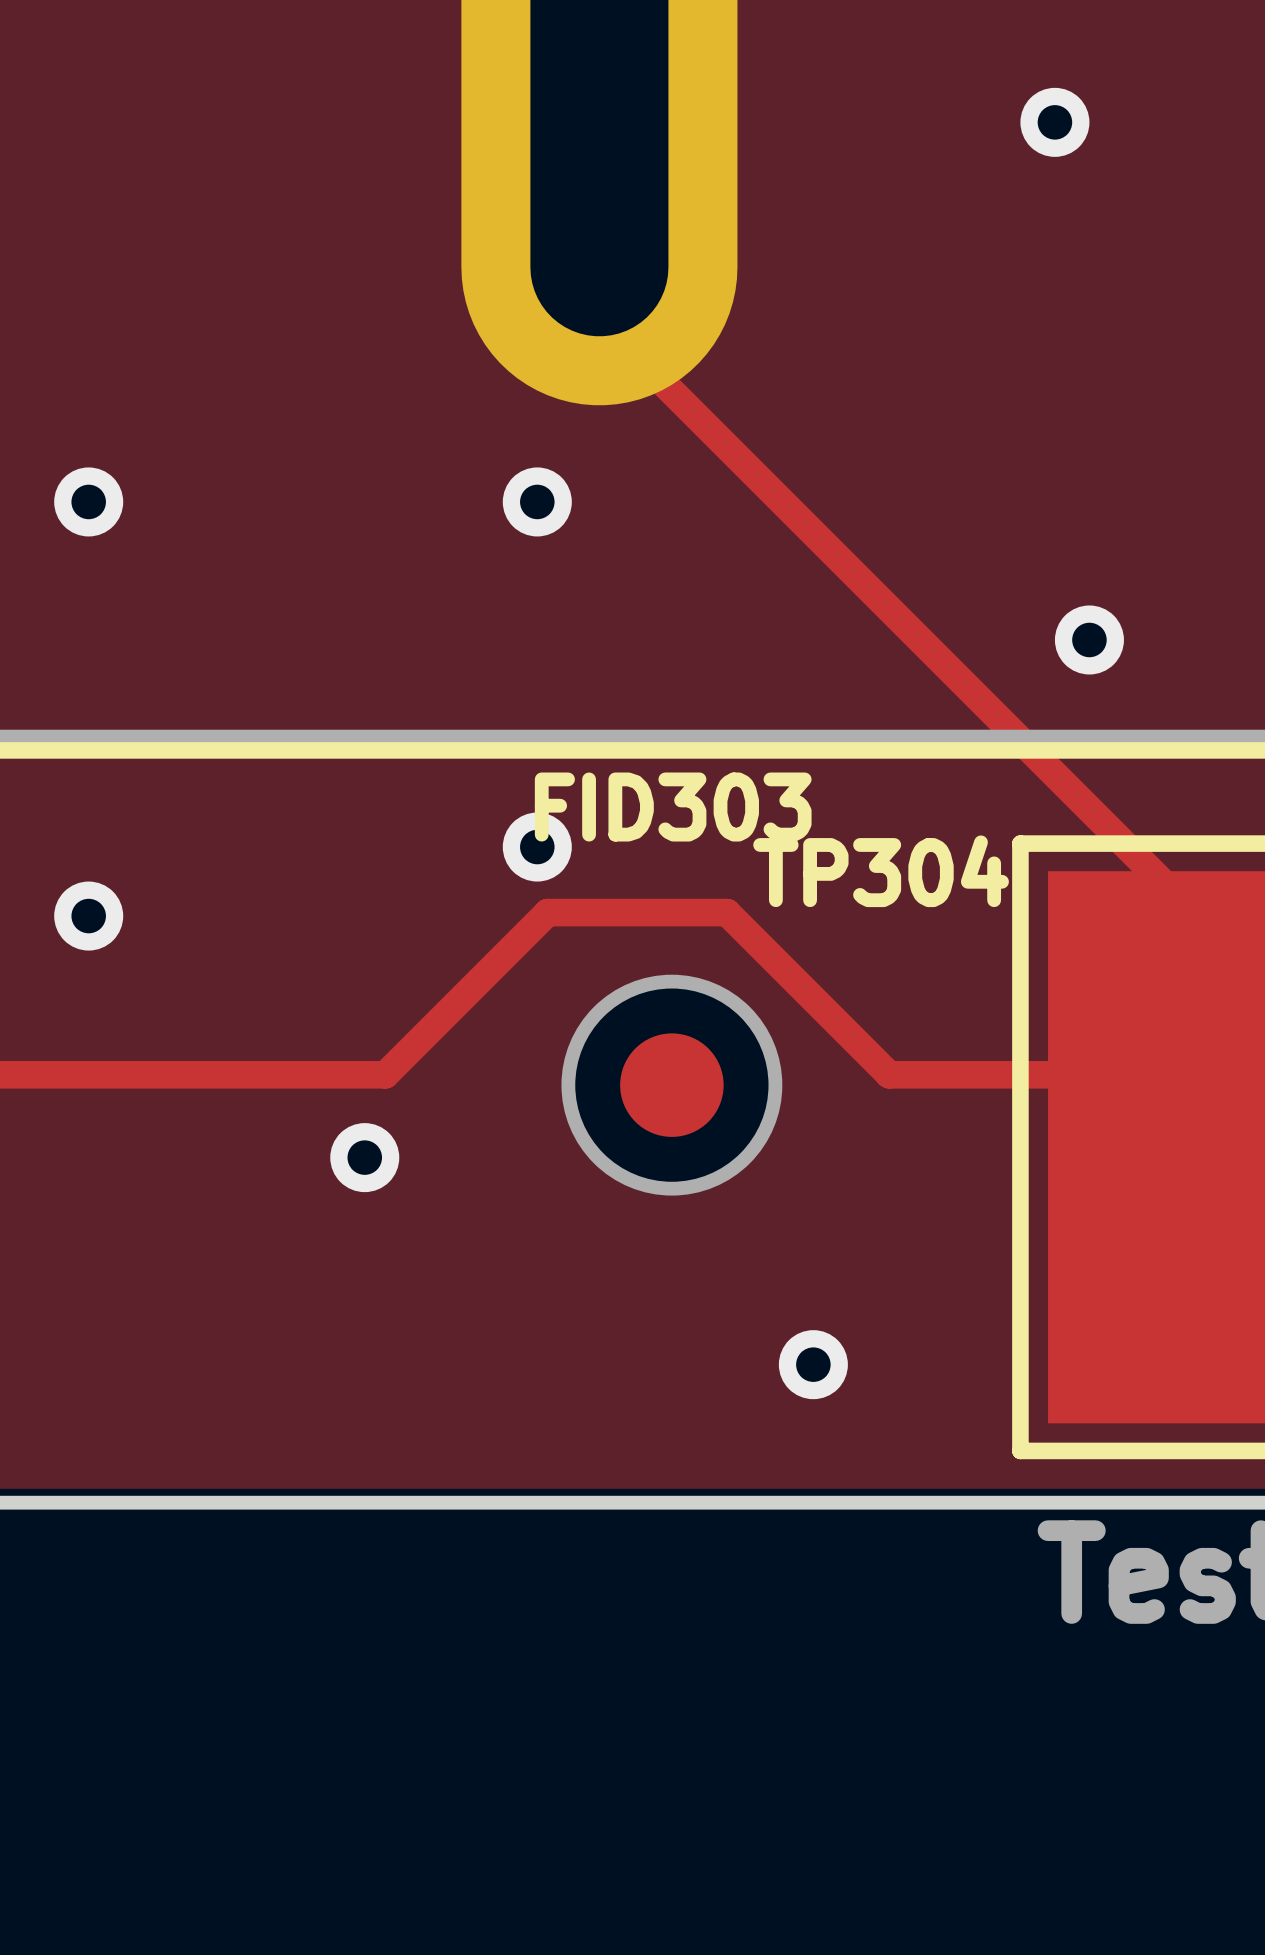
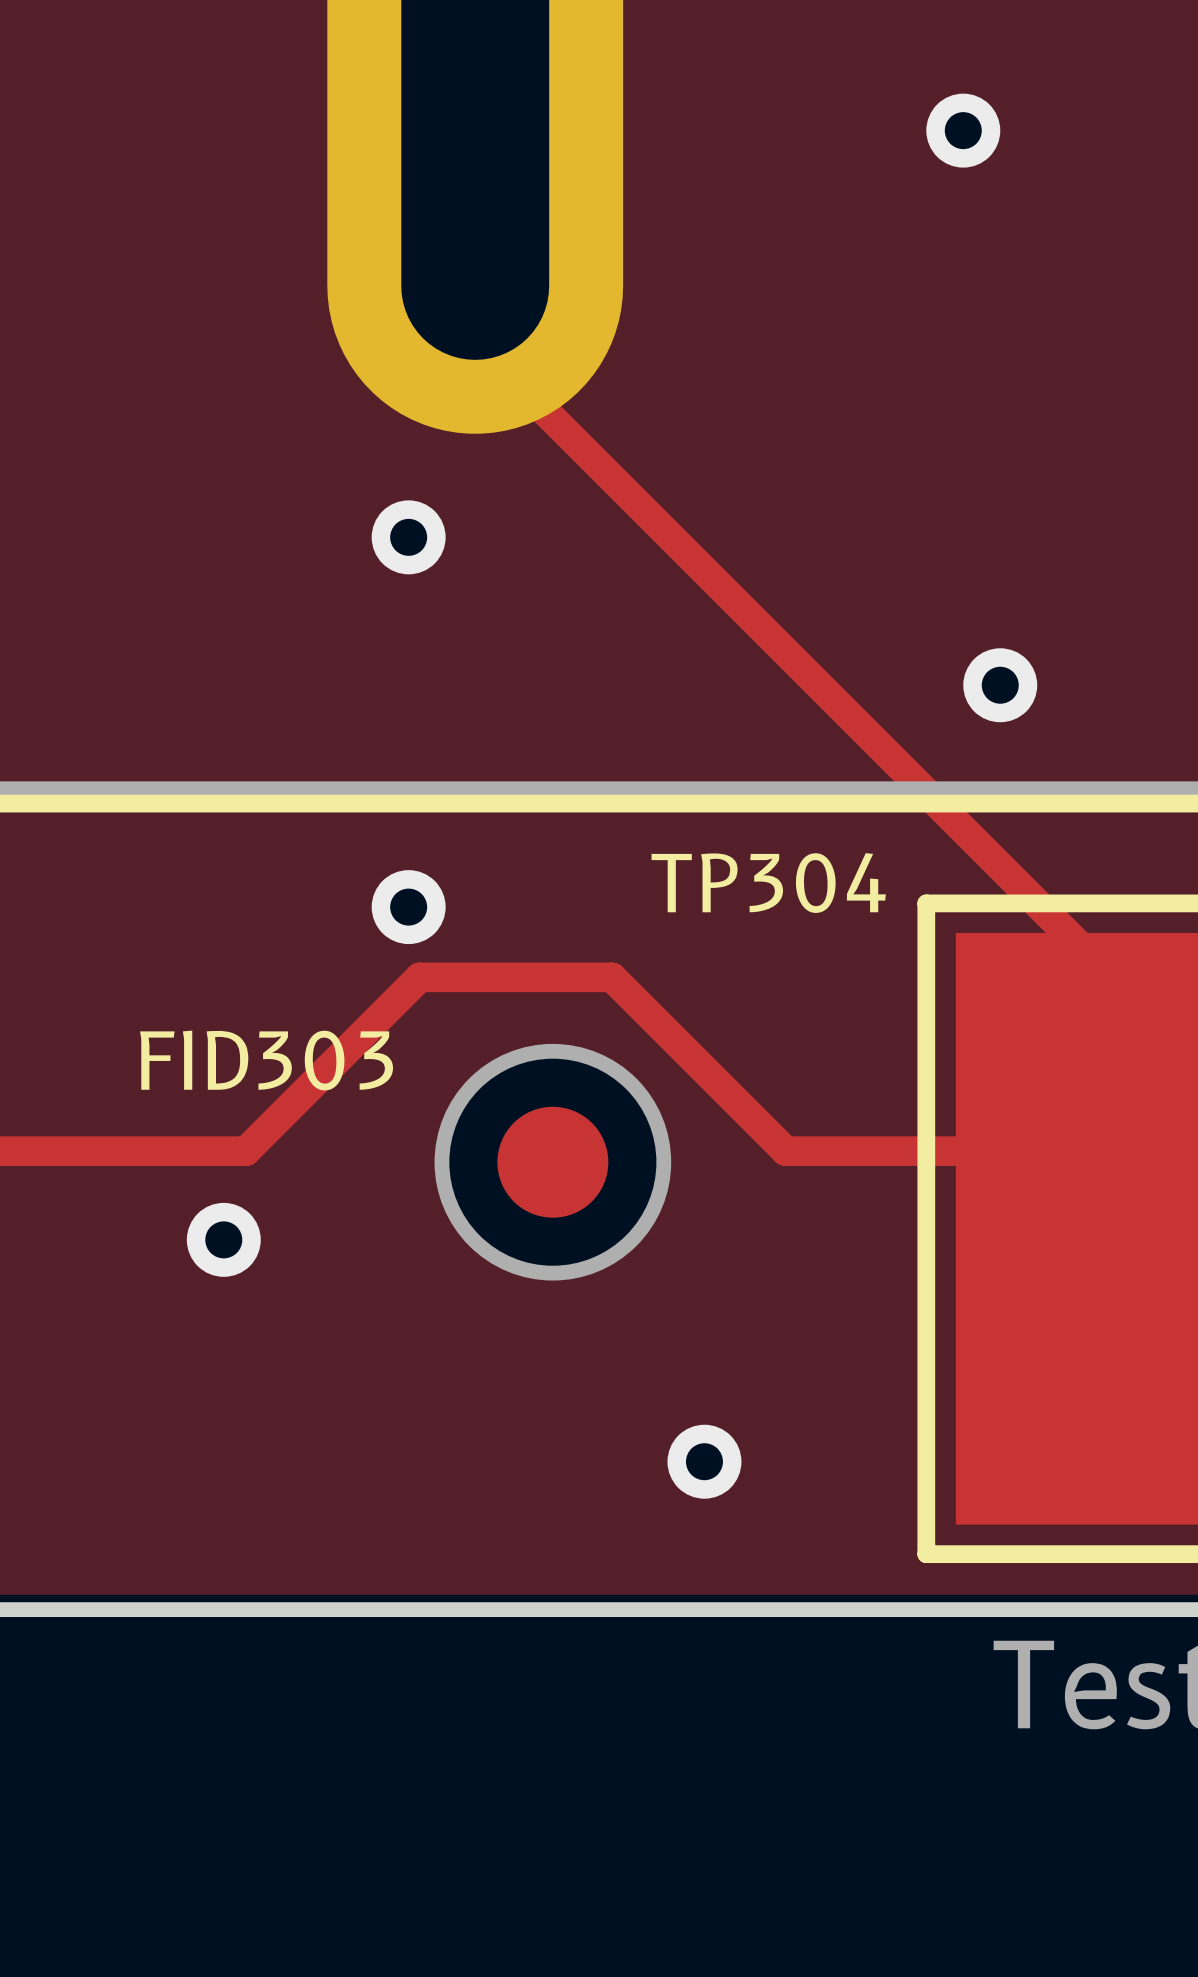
FID303 name position: FID303 (673, 807) -> FID303 (266, 1060)
TP304 name position: TP304 (881, 871) -> TP304 (768, 883)

